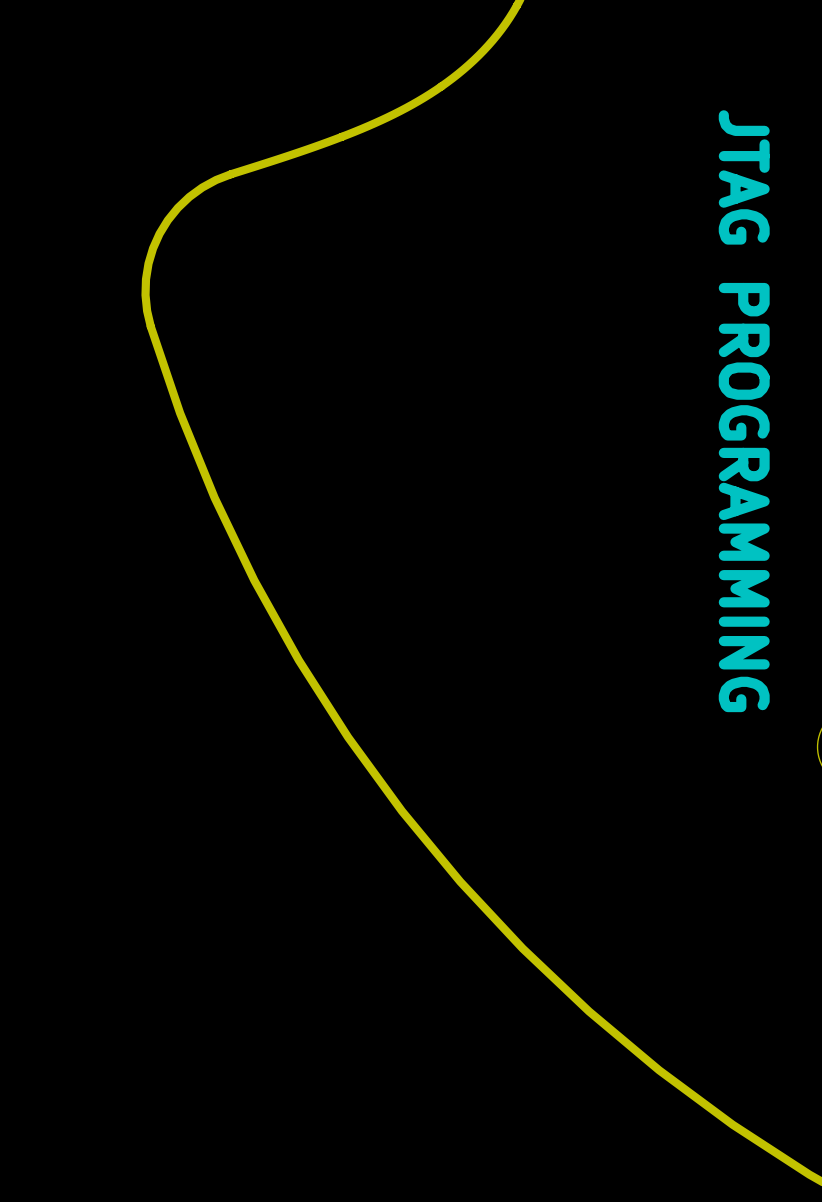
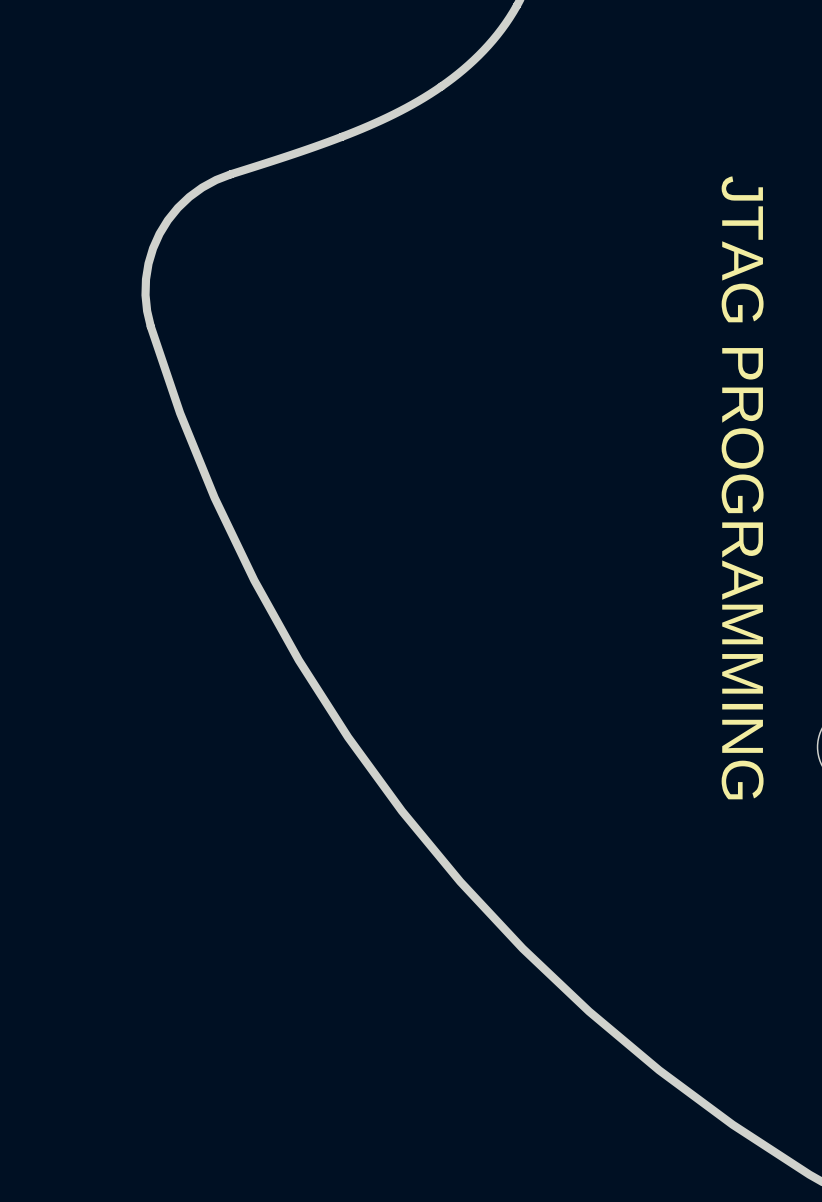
text position: JTAG PROGRAMMING (744, 411) -> JTAG PROGRAMMING (742, 487)

